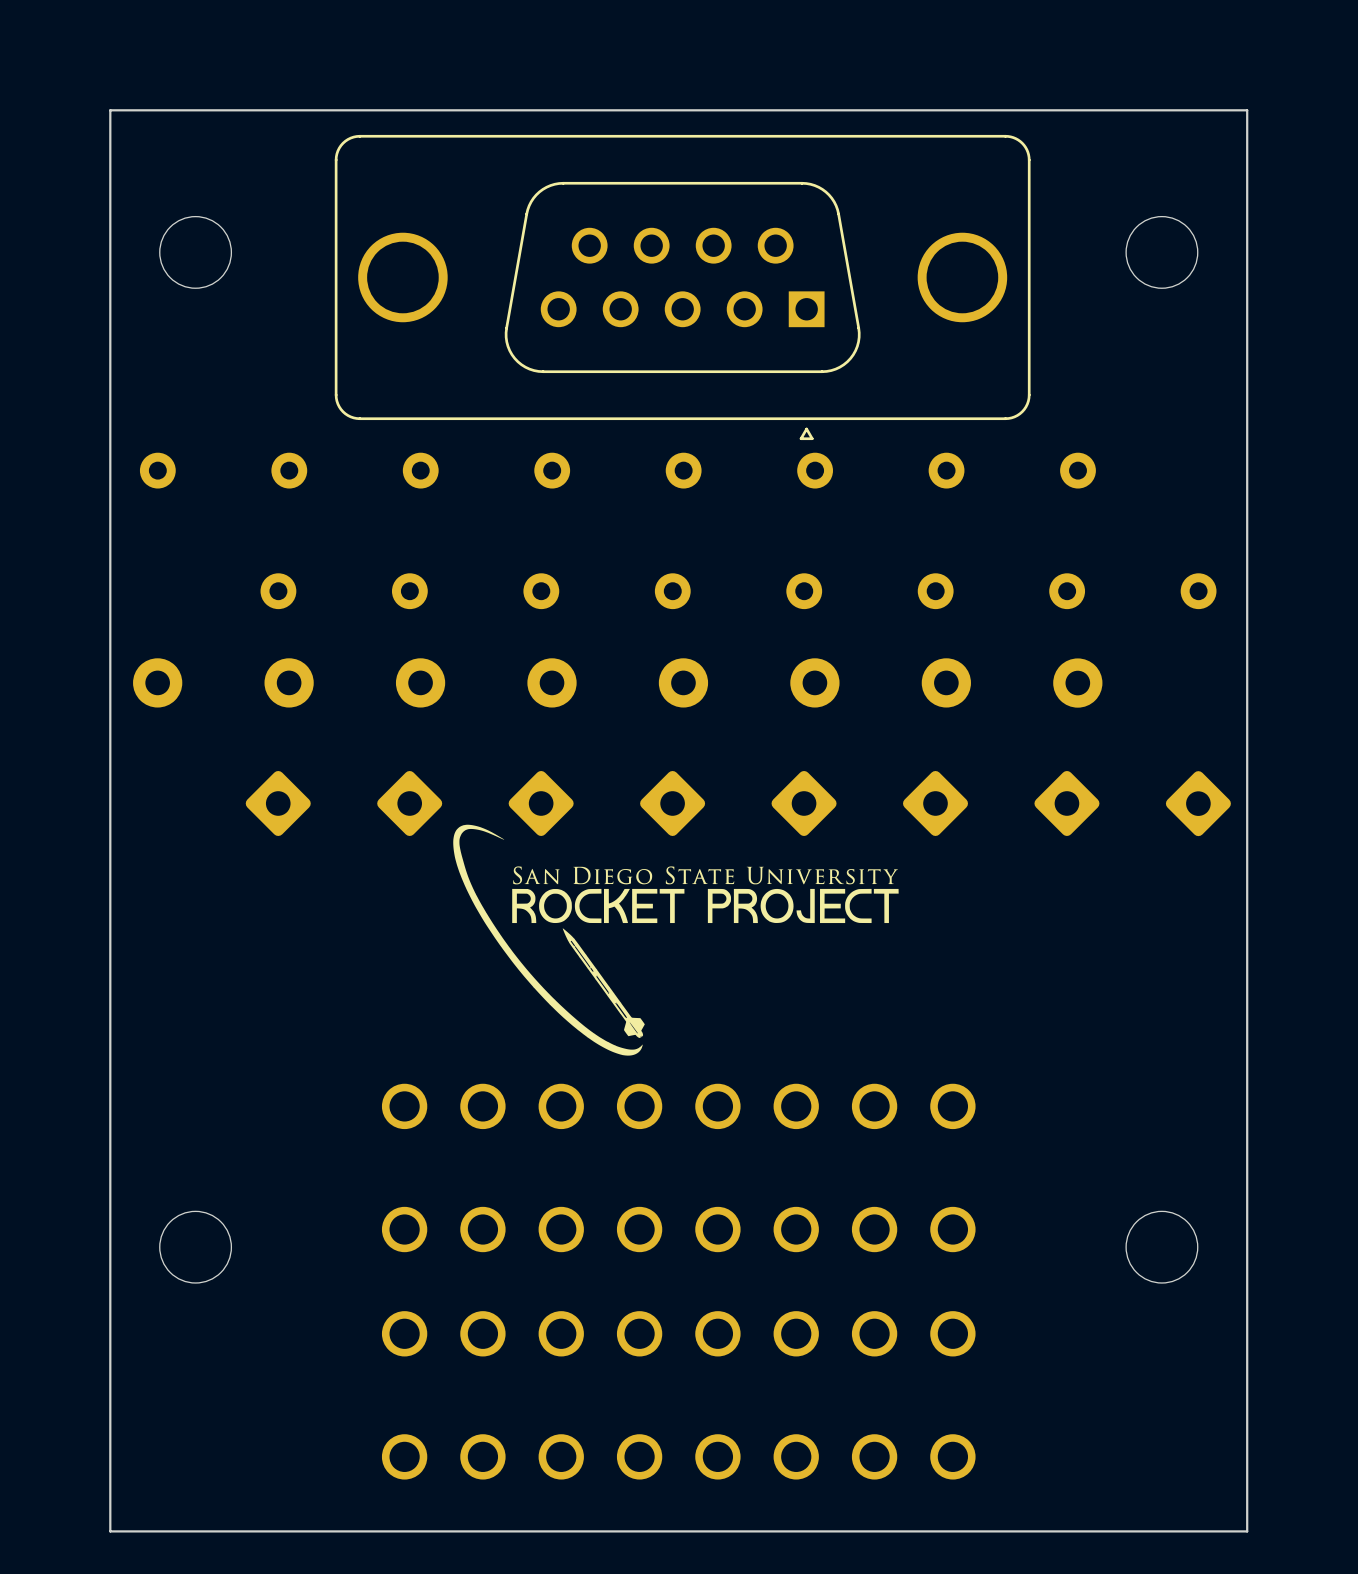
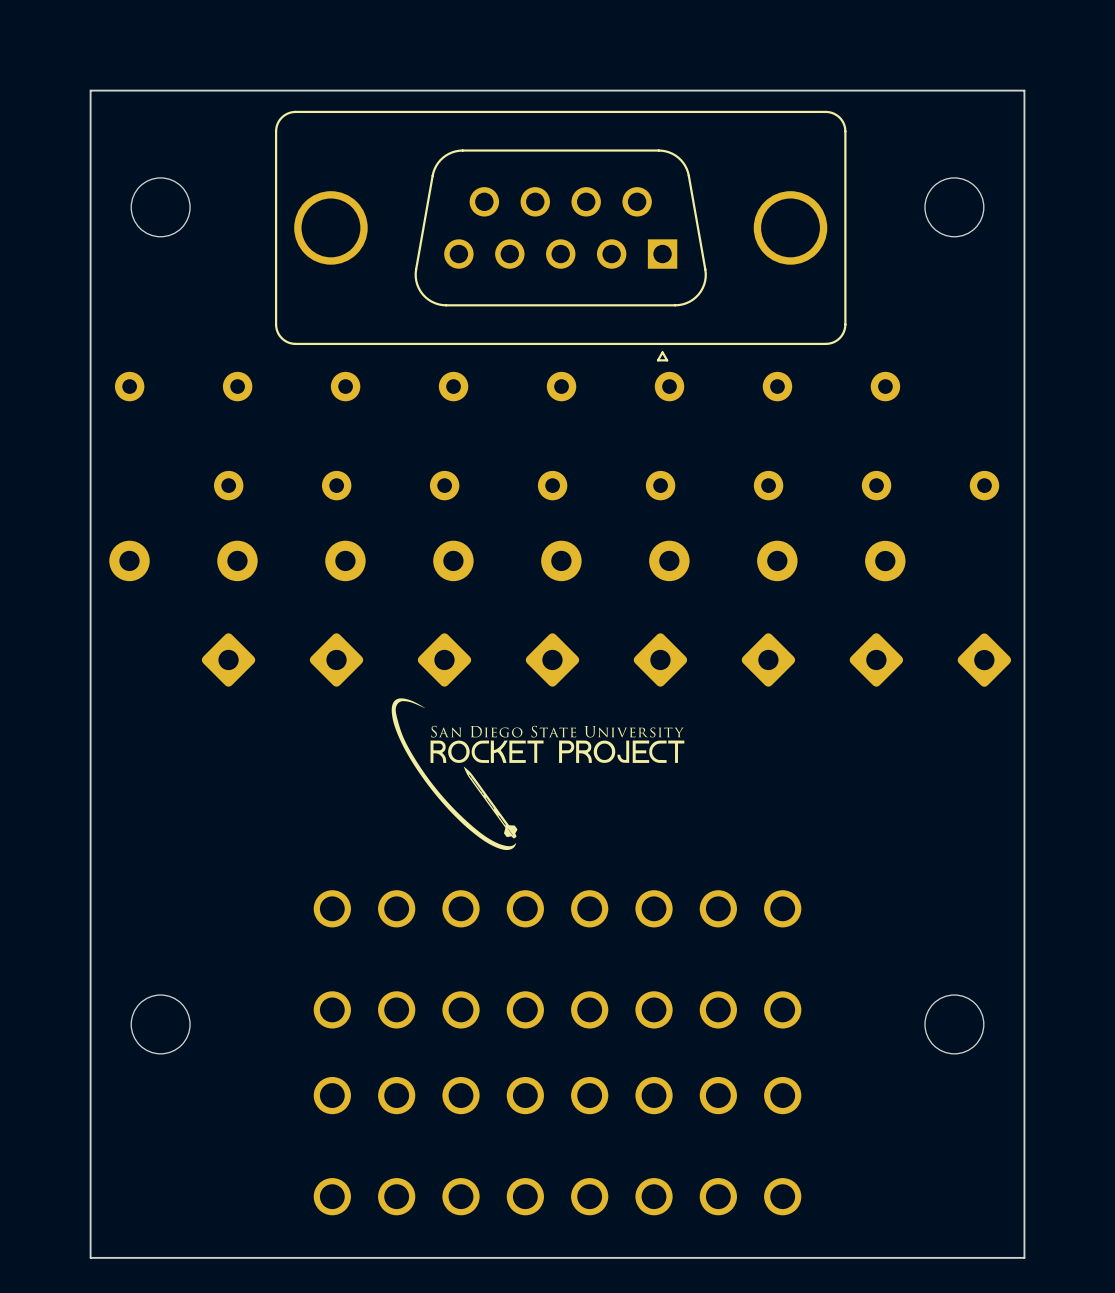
drawing shape: [453, 824, 899, 1056] -> [391, 698, 685, 851]

